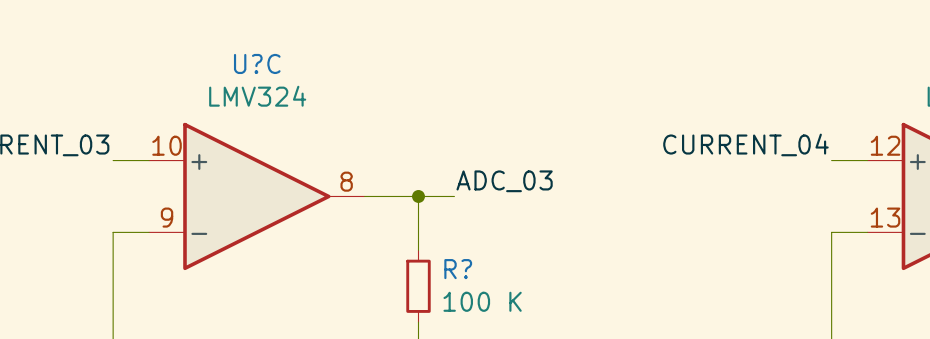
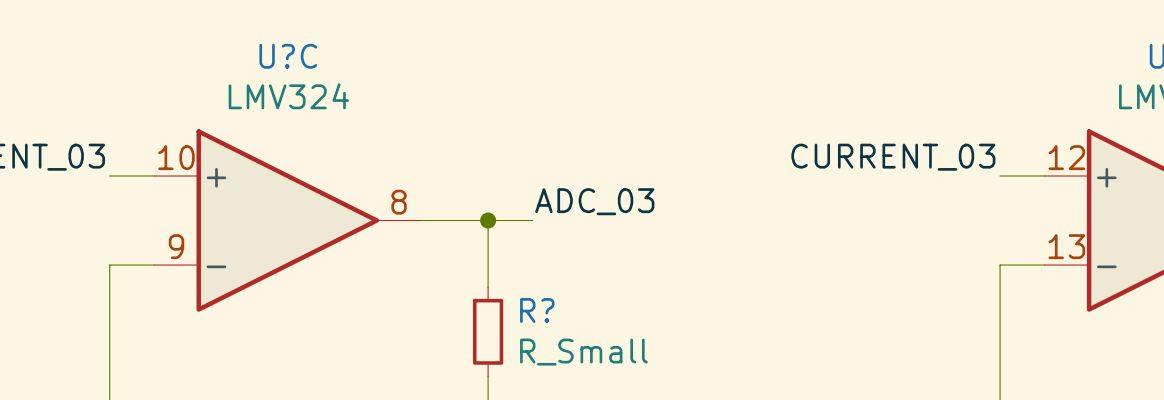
label: CURRENT_04 (745, 144) -> CURRENT_03 (893, 157)
R? value: 100 K (482, 301) -> R_Small (583, 352)

